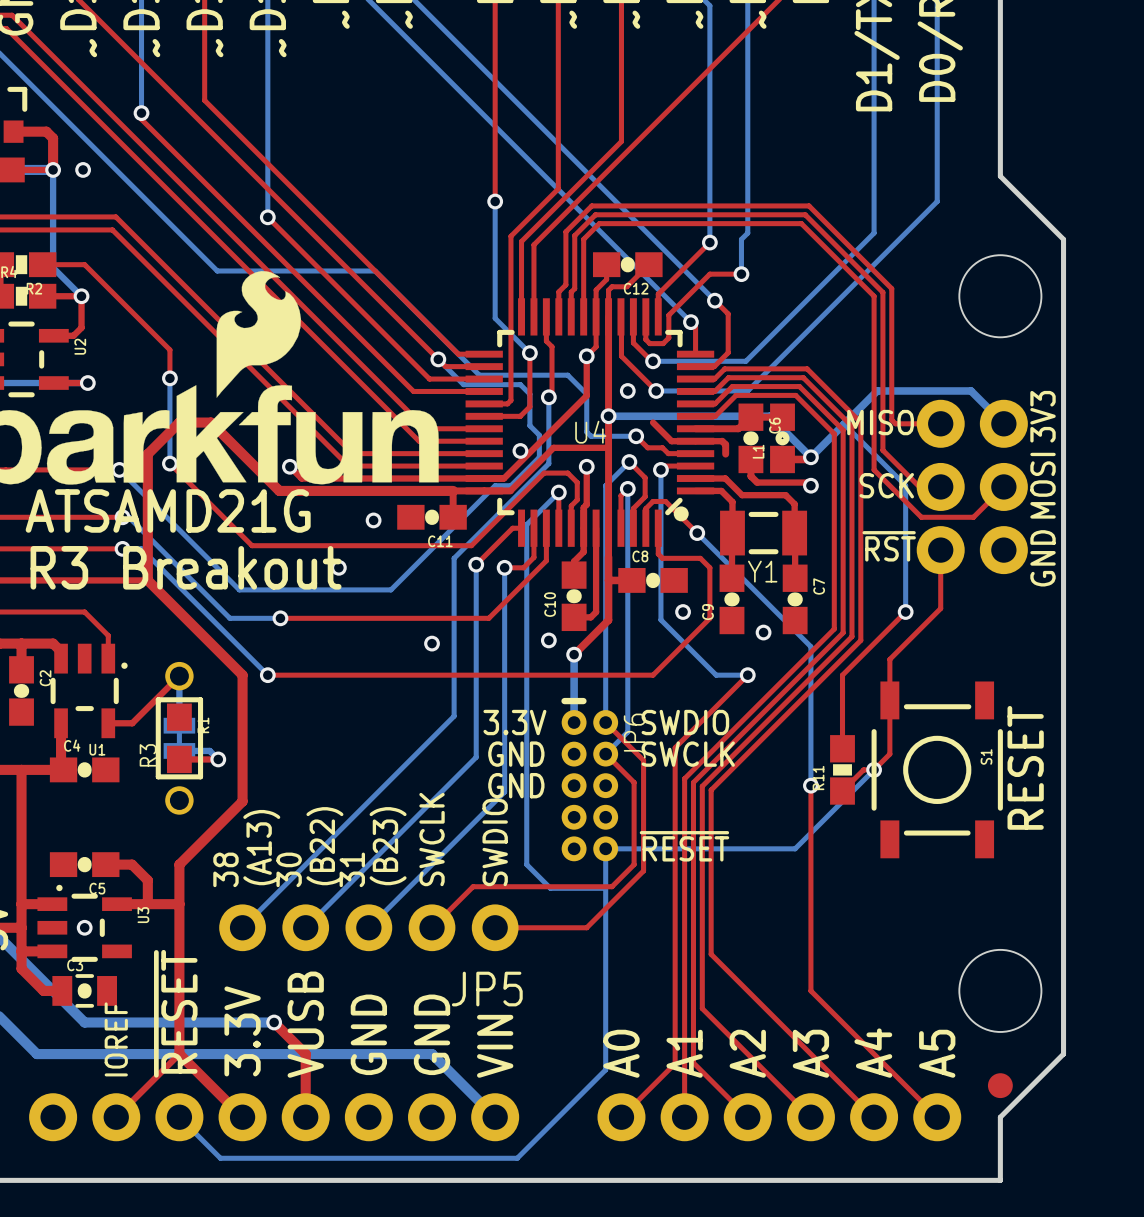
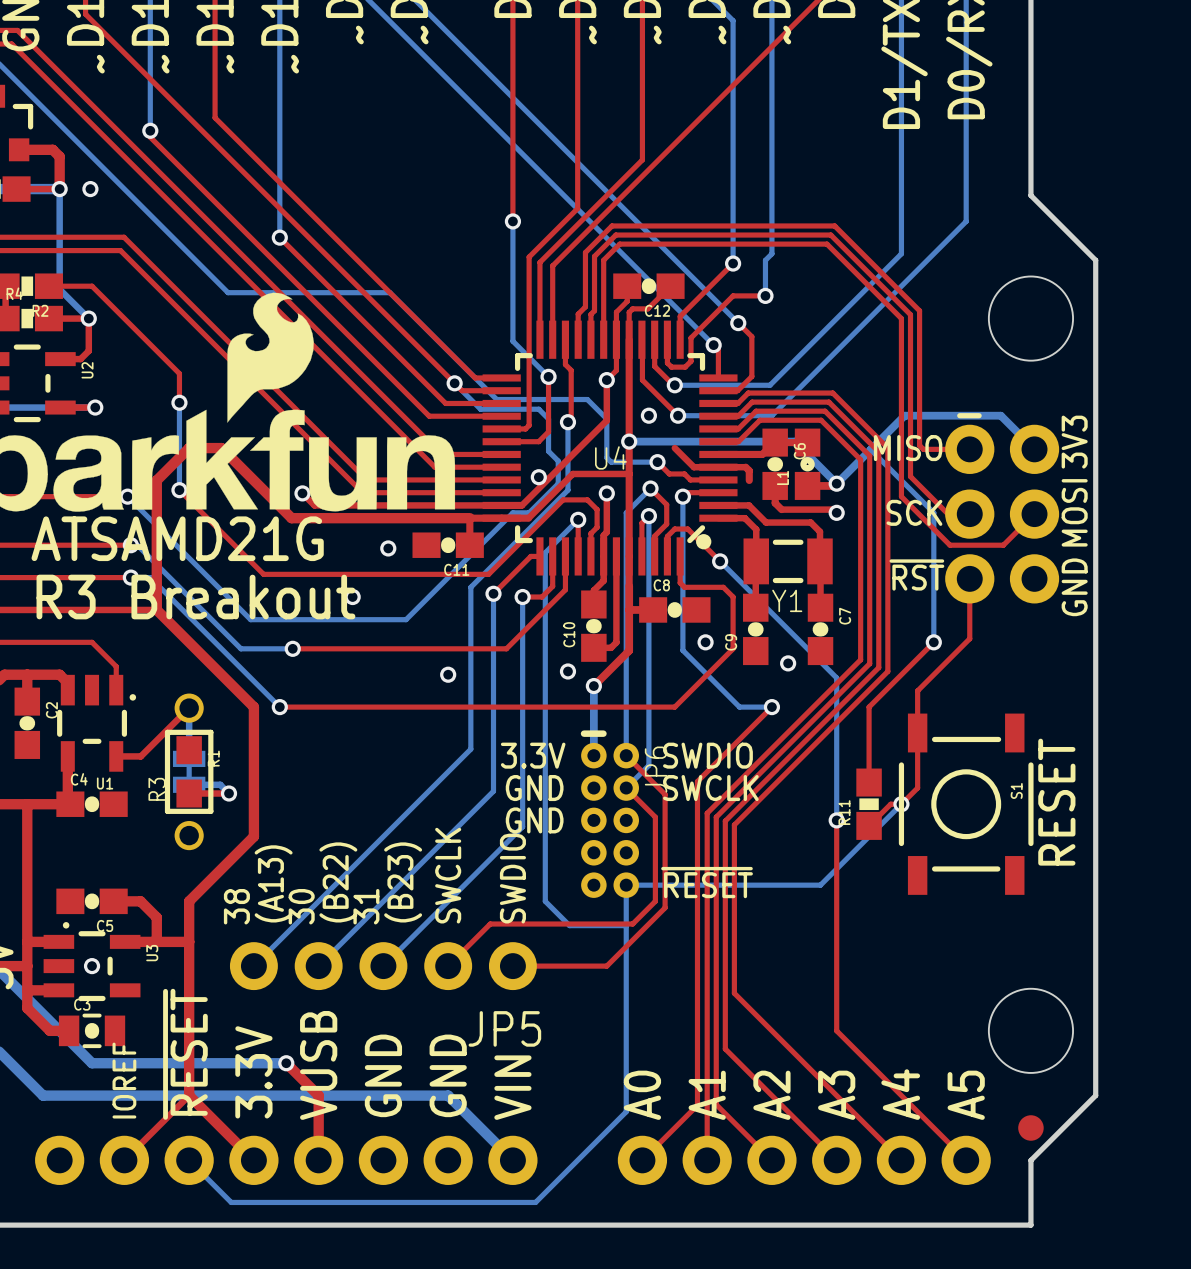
line: none -> (959, 415) (979, 415)

